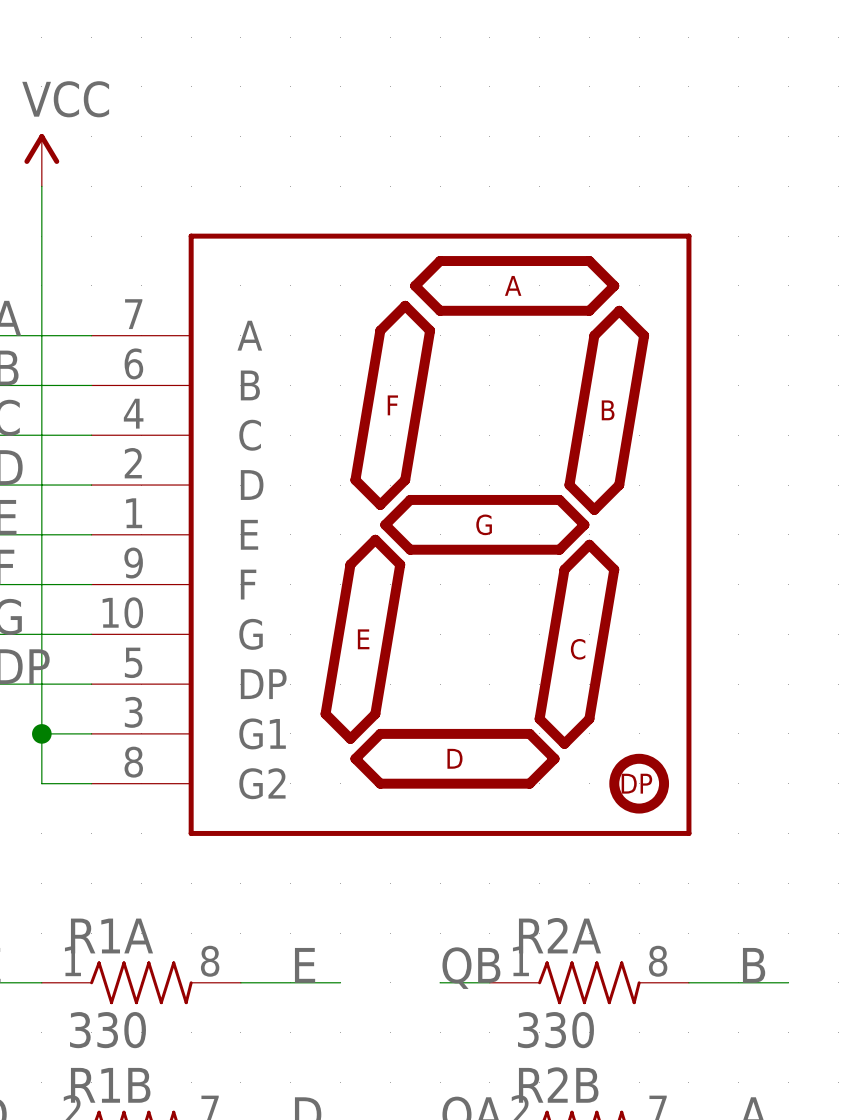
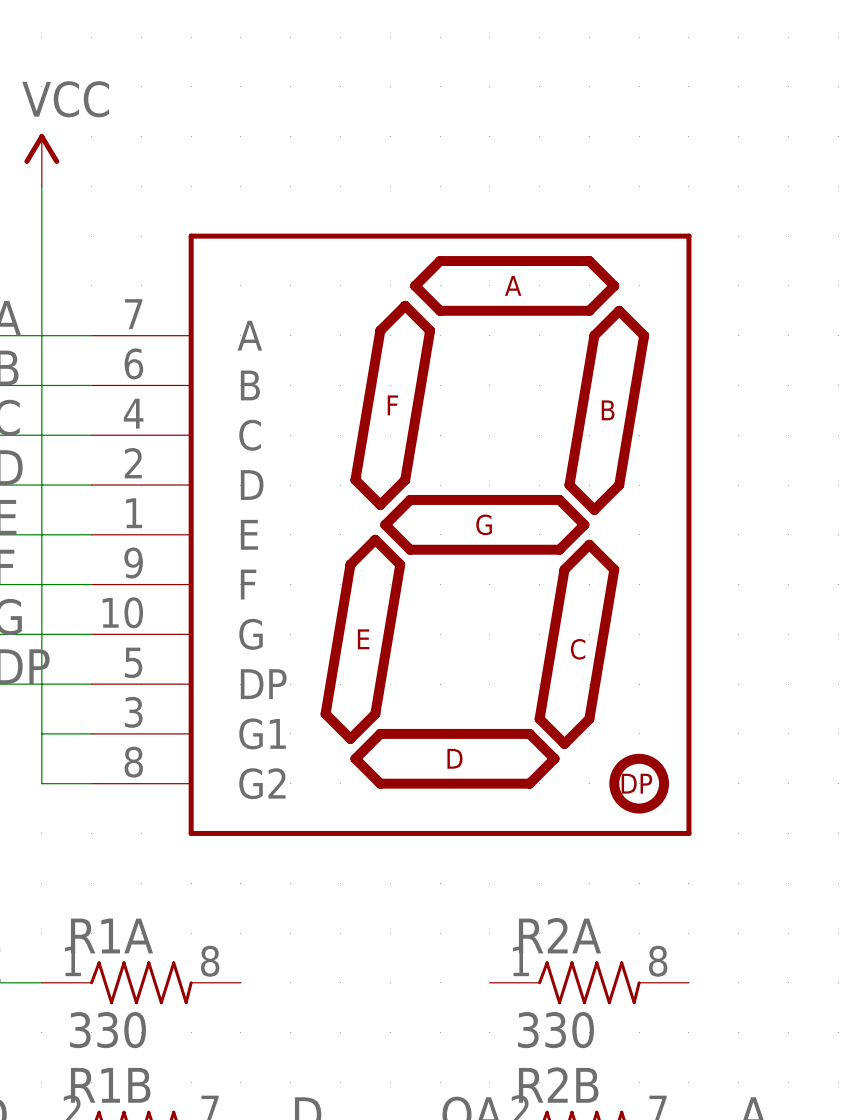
junction: (41, 733) -> none
label: E (305, 965) -> none
label: B (754, 965) -> none
label: QB (471, 968) -> none
wire: (240, 982) (340, 982) -> none
wire: (440, 982) (489, 982) -> none
wire: (688, 982) (788, 982) -> none

